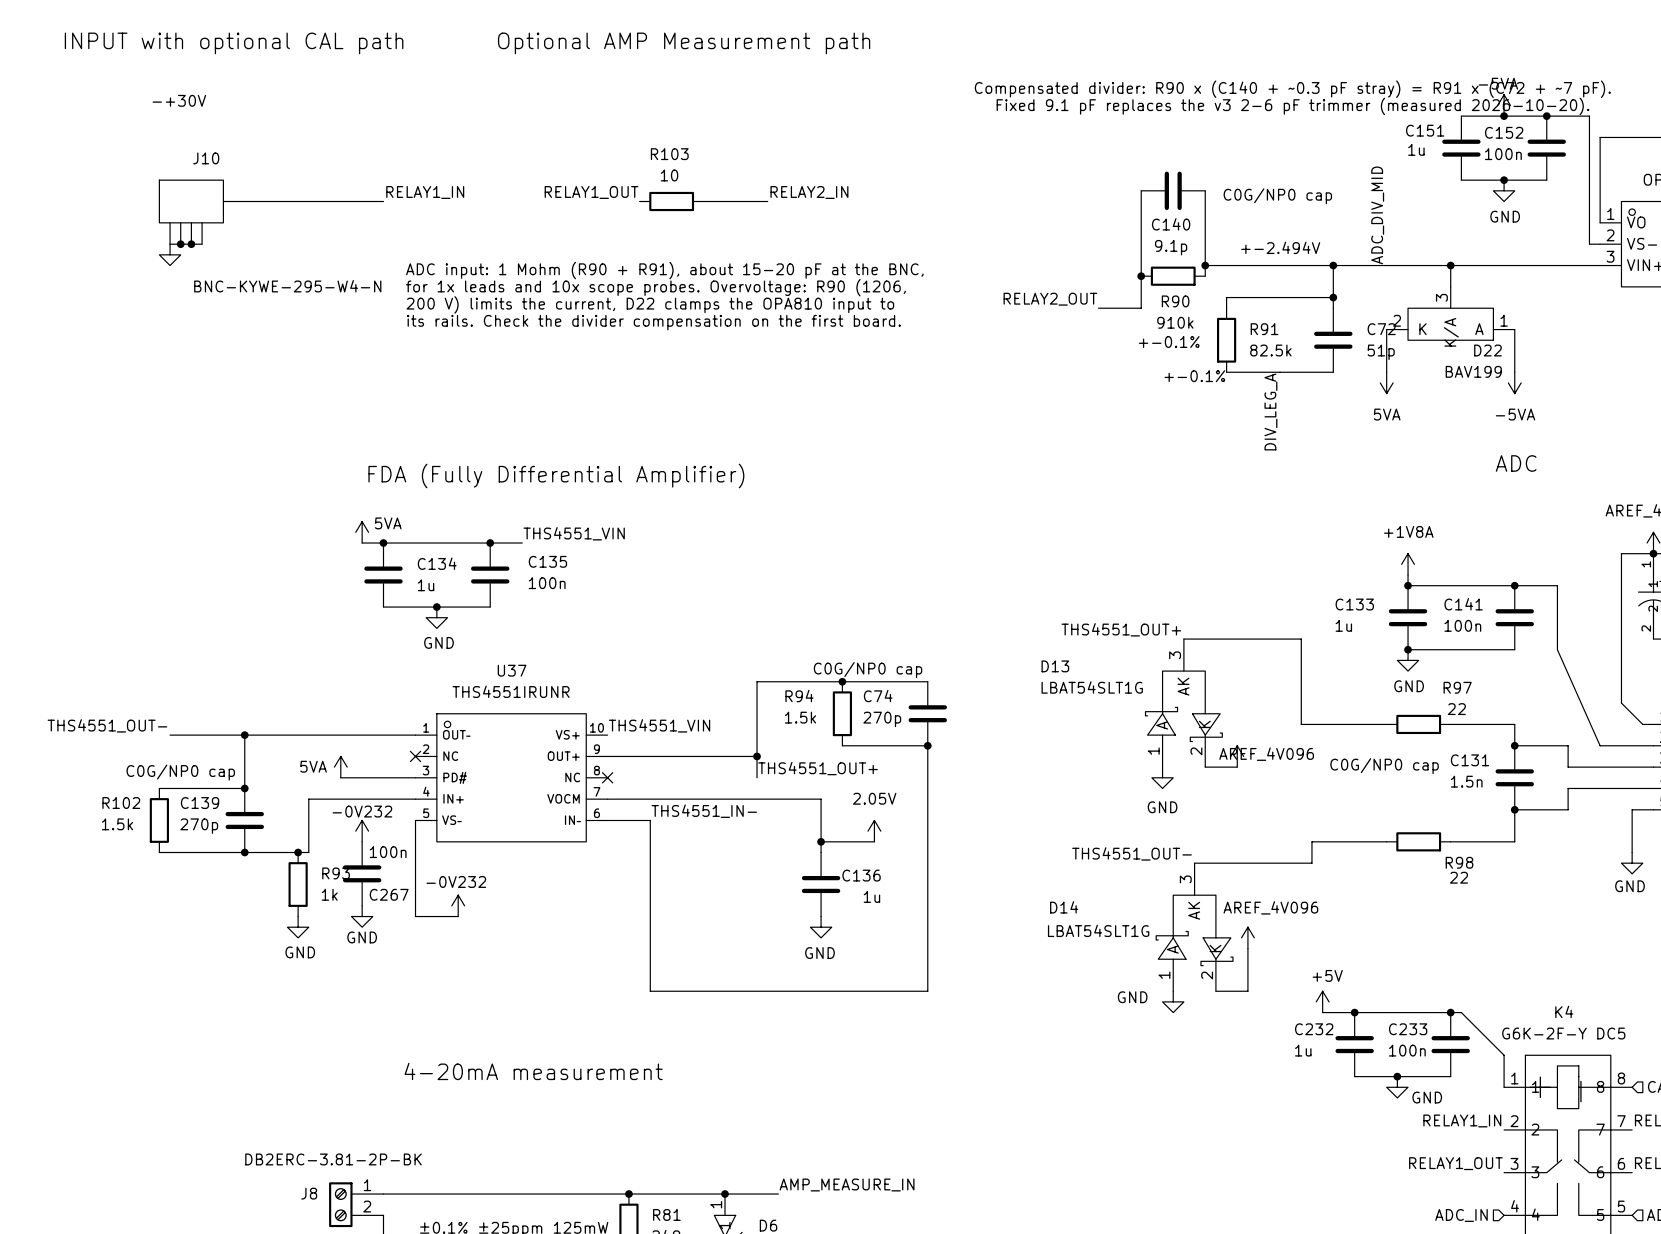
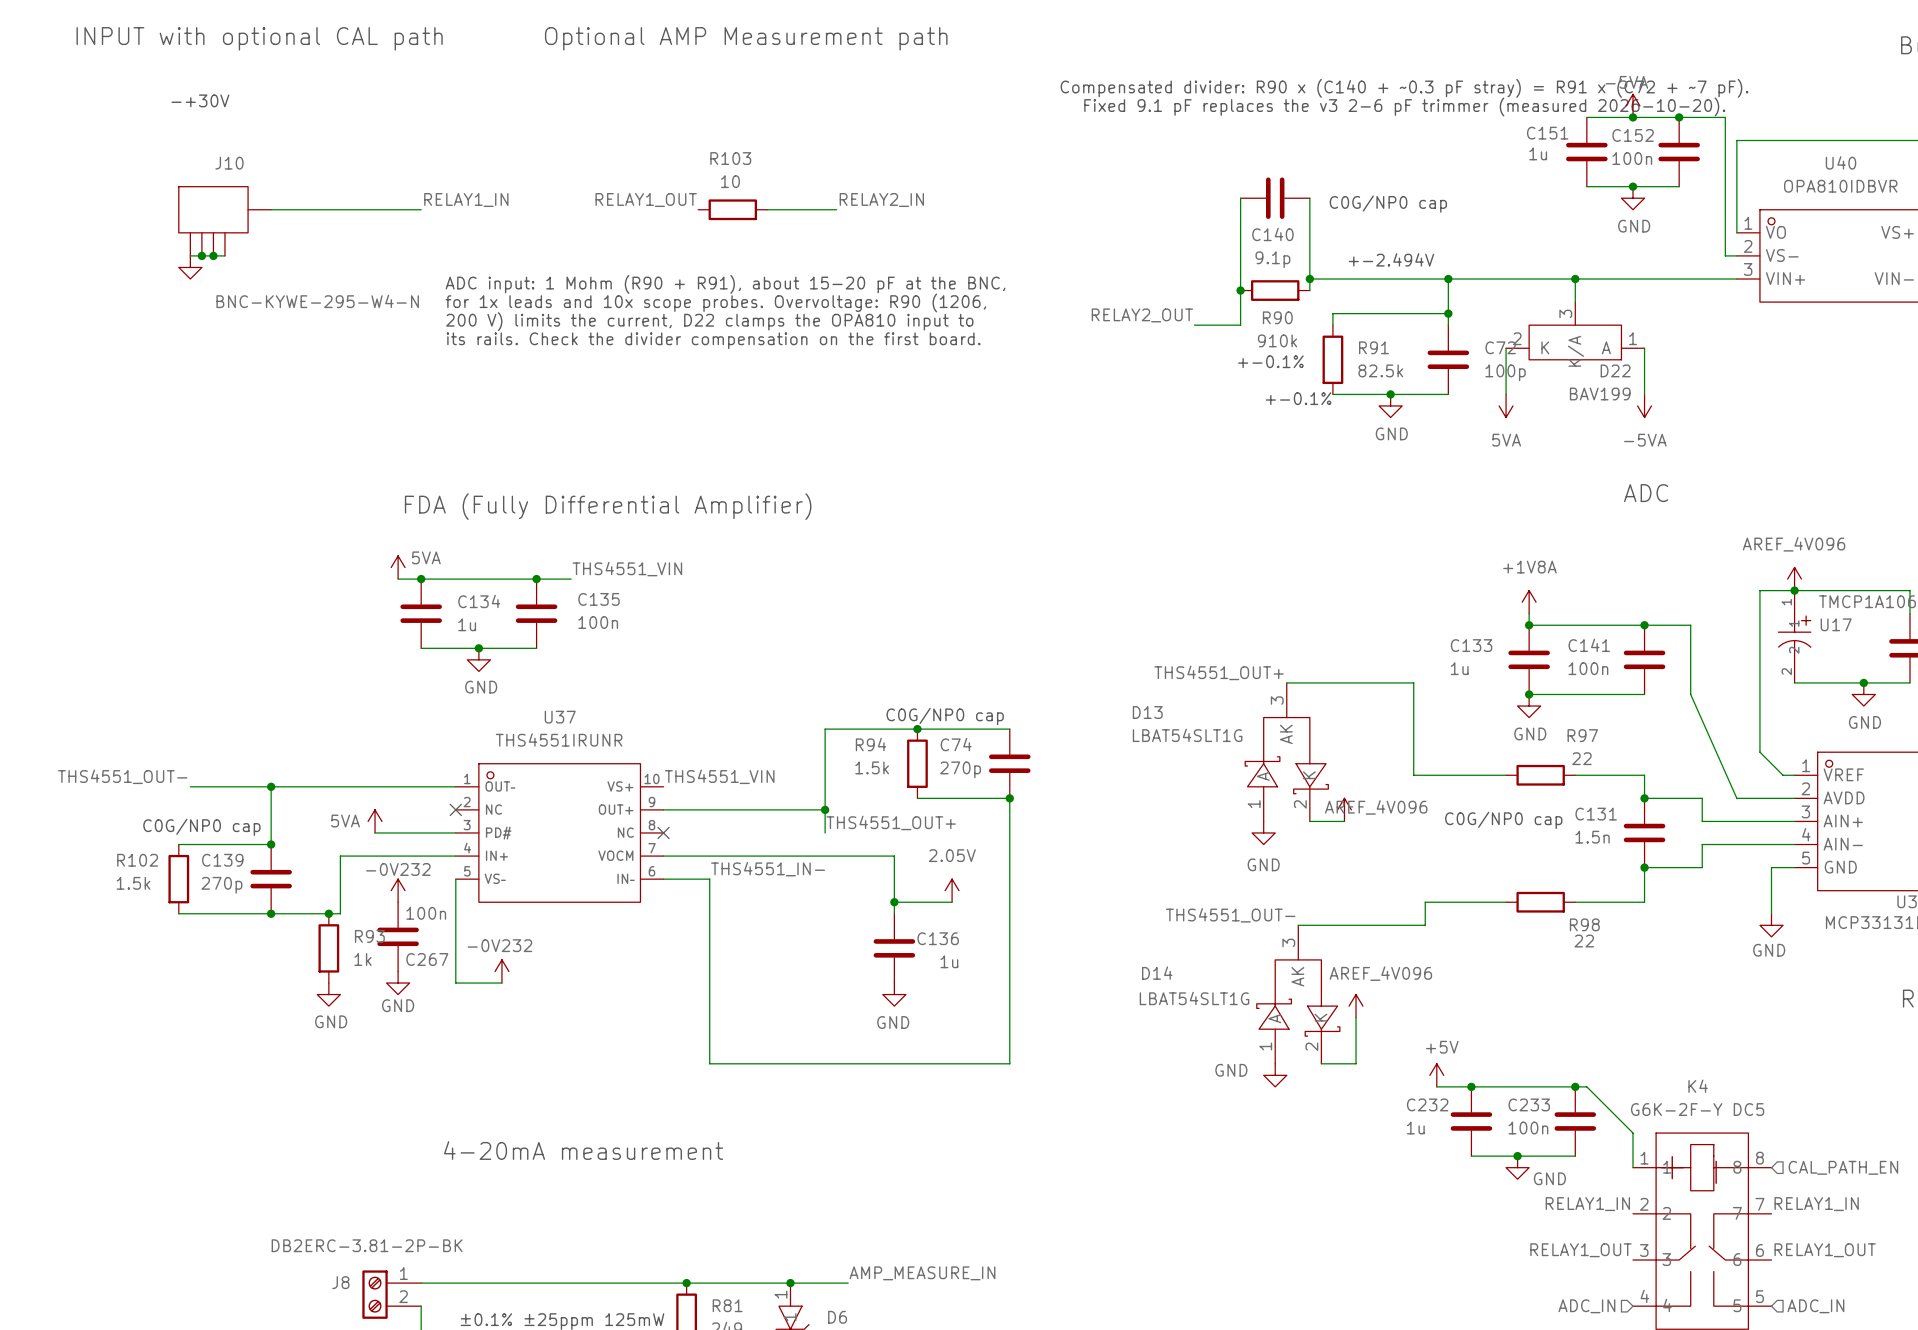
label: ADC_DIV_MID (1377, 215) -> none
C72 value: 51p (1381, 352) -> 100p (1505, 372)
junction: none -> (1390, 394)
power symbol: none -> GND (1390, 405)
label: DIV_LEG_A (1270, 411) -> none

